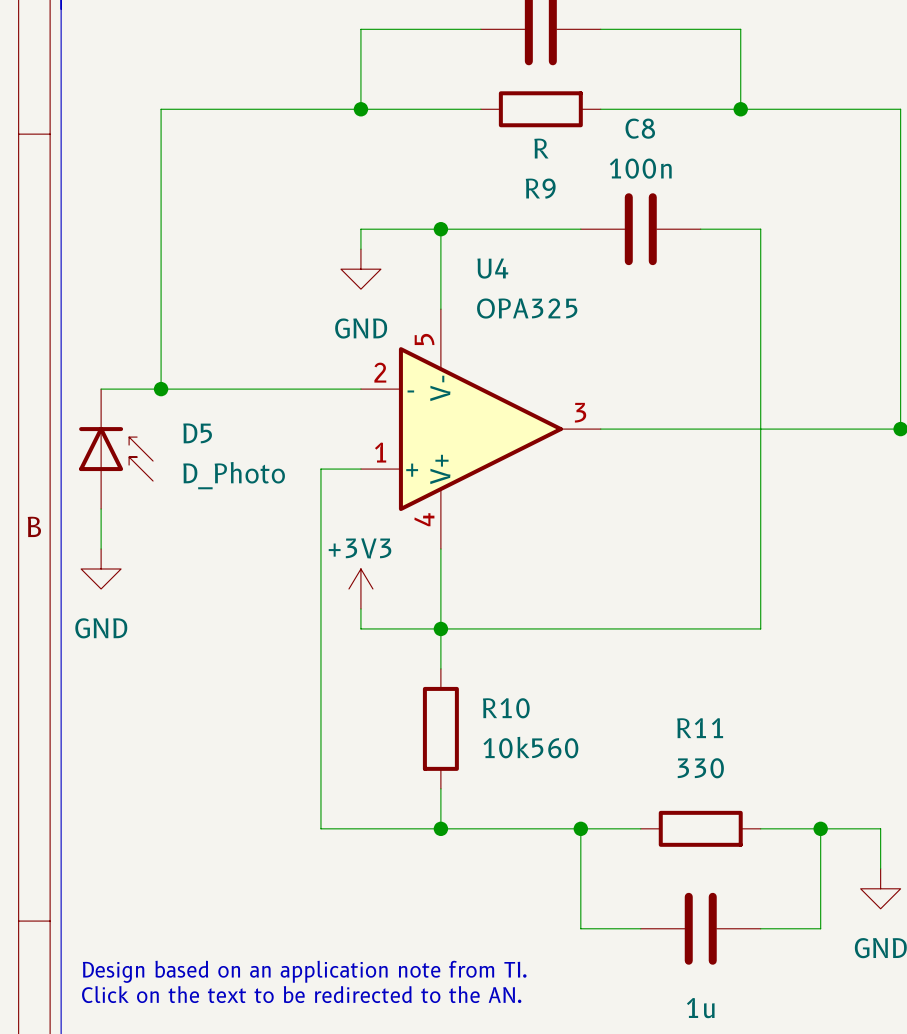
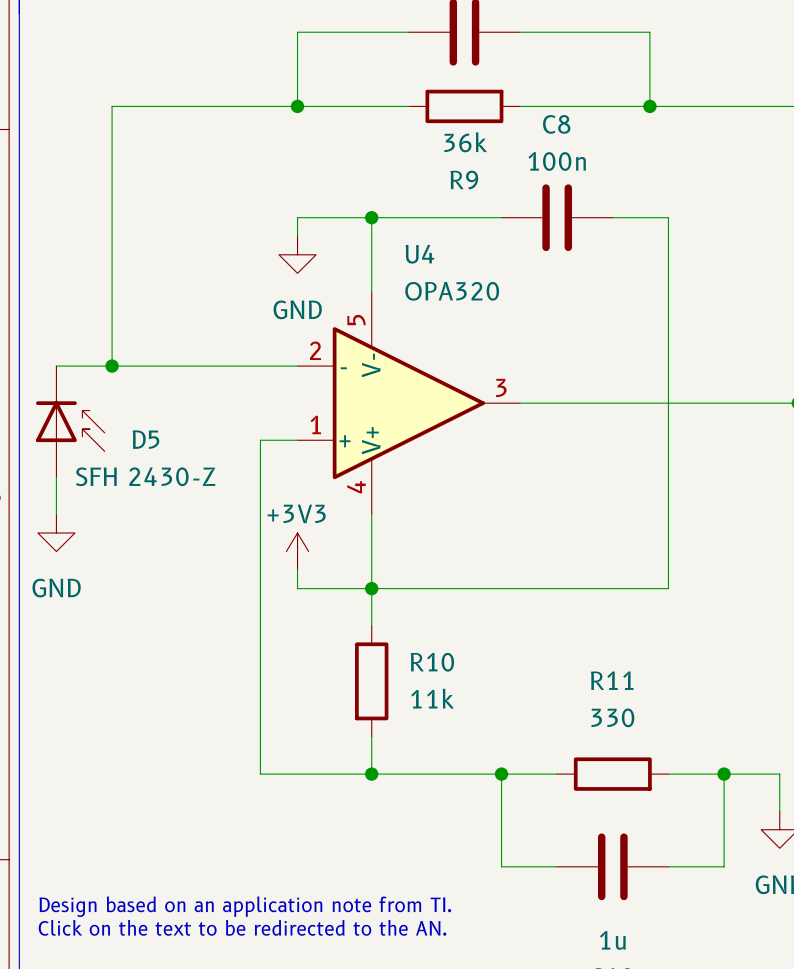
R9 value: R (541, 148) -> 36k (465, 142)
U4 value: OPA325 (527, 308) -> OPA320 (452, 291)
D5 name position: D5 (197, 433) -> D5 (145, 439)
D5 value: D_Photo (234, 475) -> SFH 2430-Z (145, 476)
R10 value: 10k560 (530, 747) -> 11k (432, 698)

